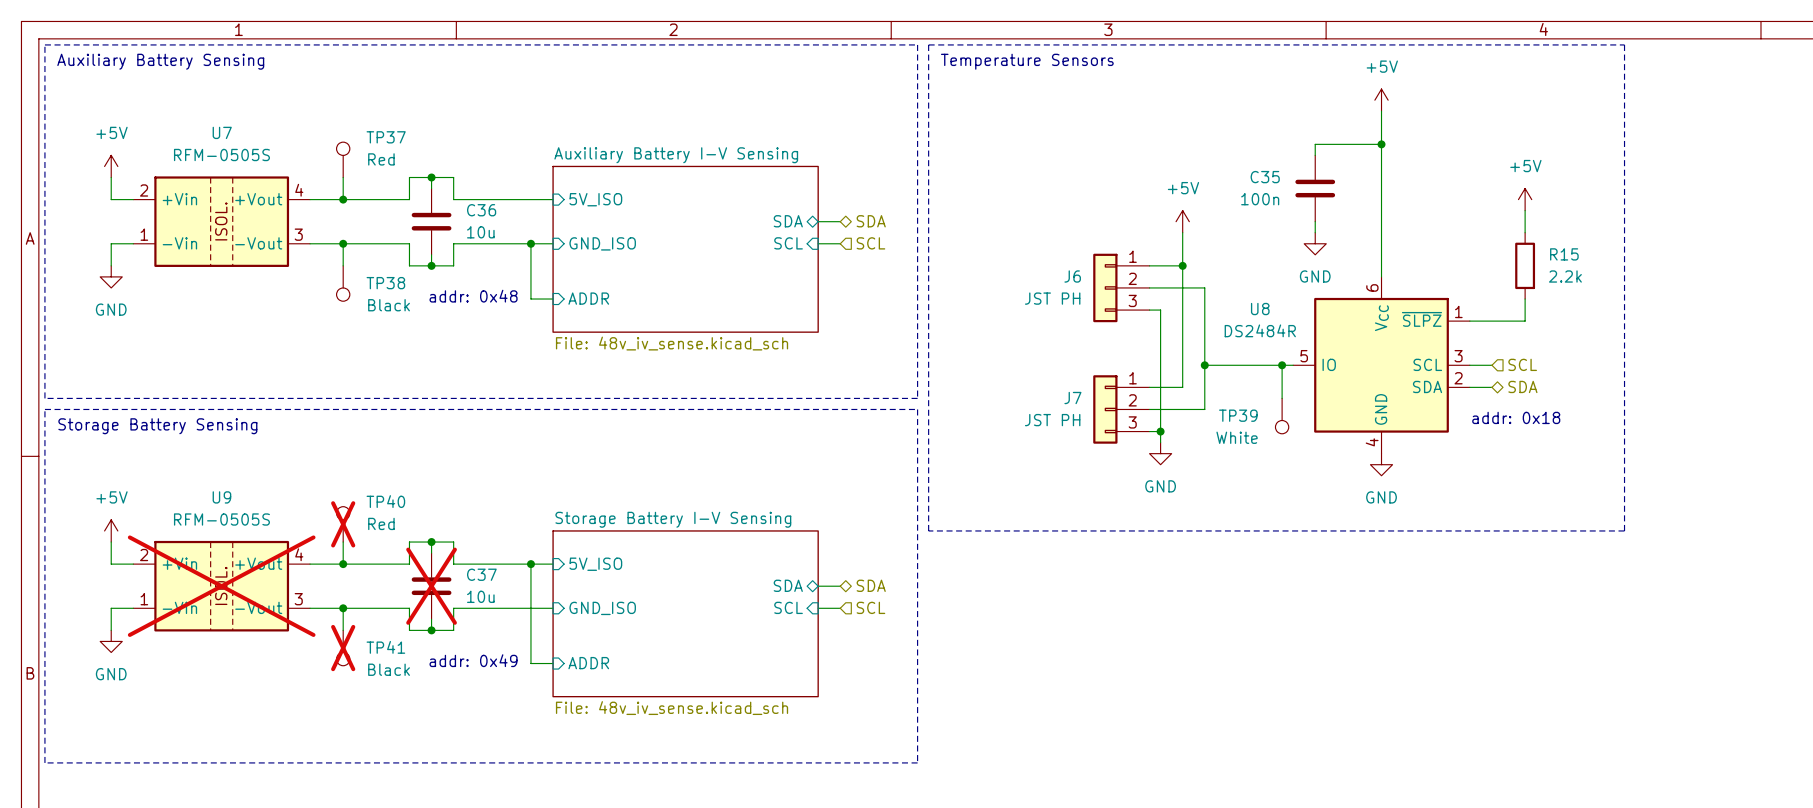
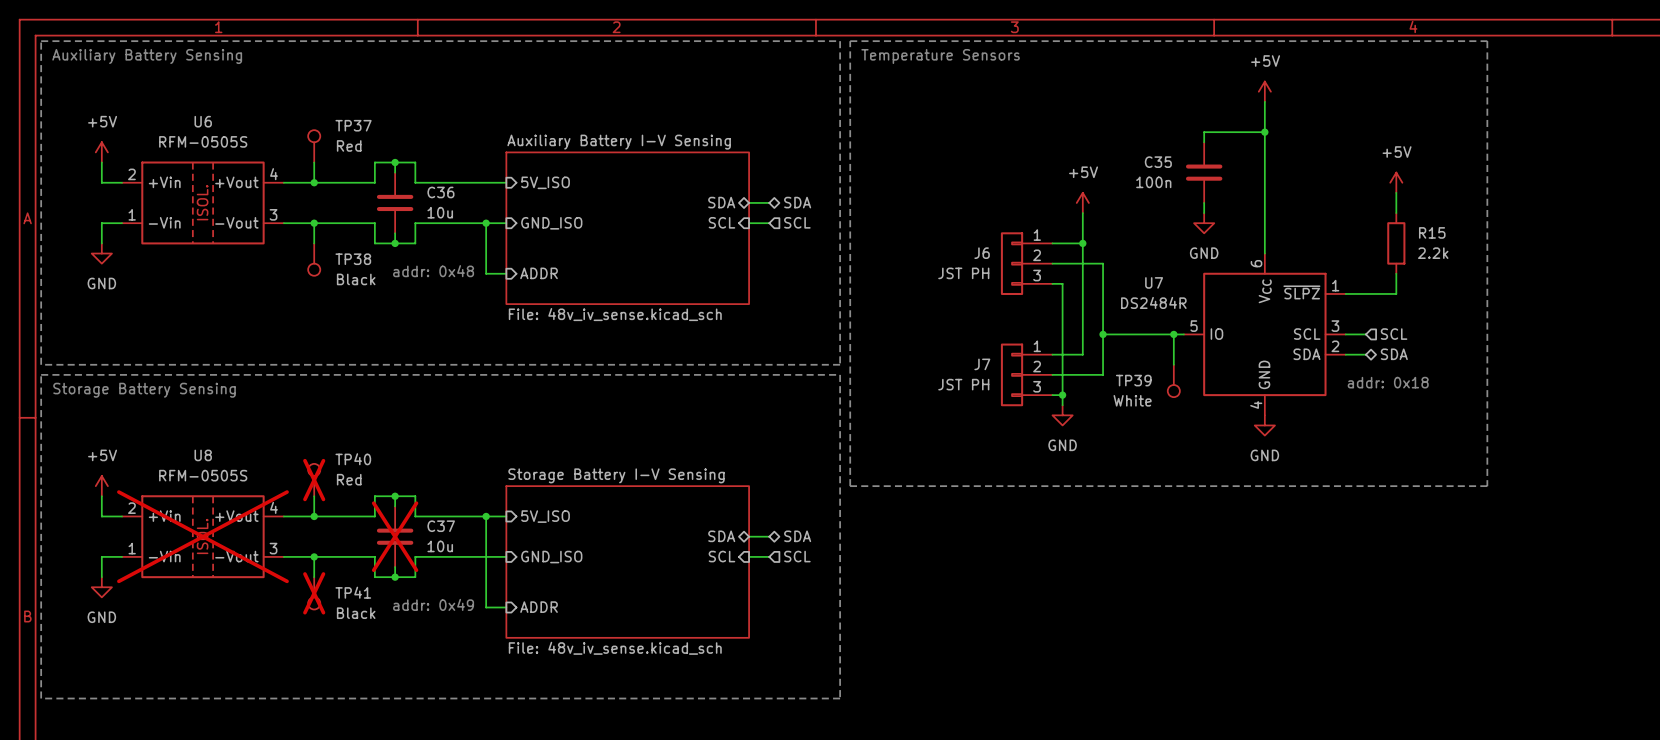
U7 name: U7 (222, 132) -> U6 (203, 121)
U8 name: U8 (1260, 309) -> U7 (1154, 282)
U9 name: U9 (221, 497) -> U8 (203, 455)

